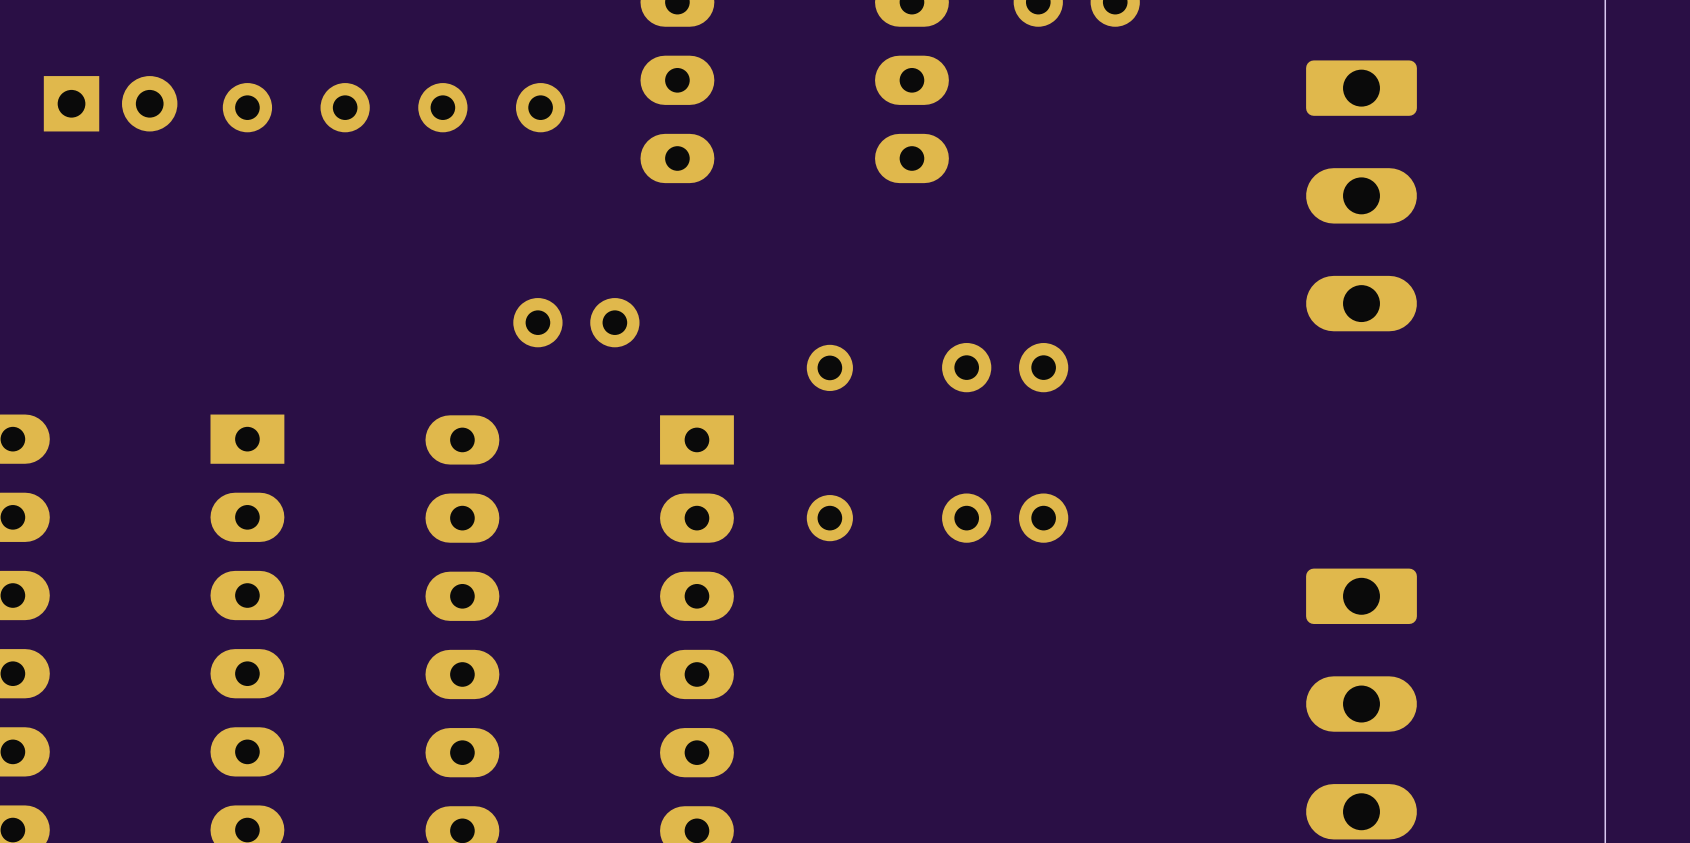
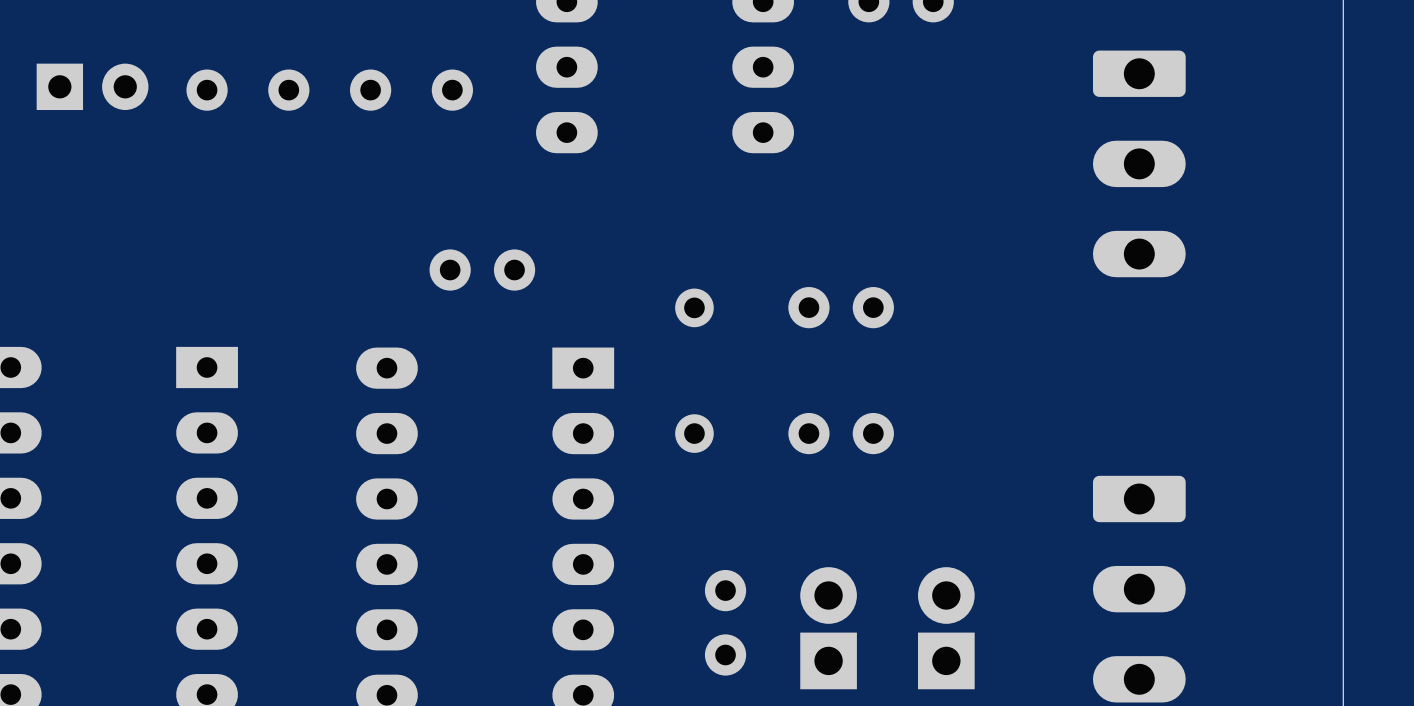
part: none -> (725, 622)
part: none -> (828, 628)
part: none -> (946, 628)

